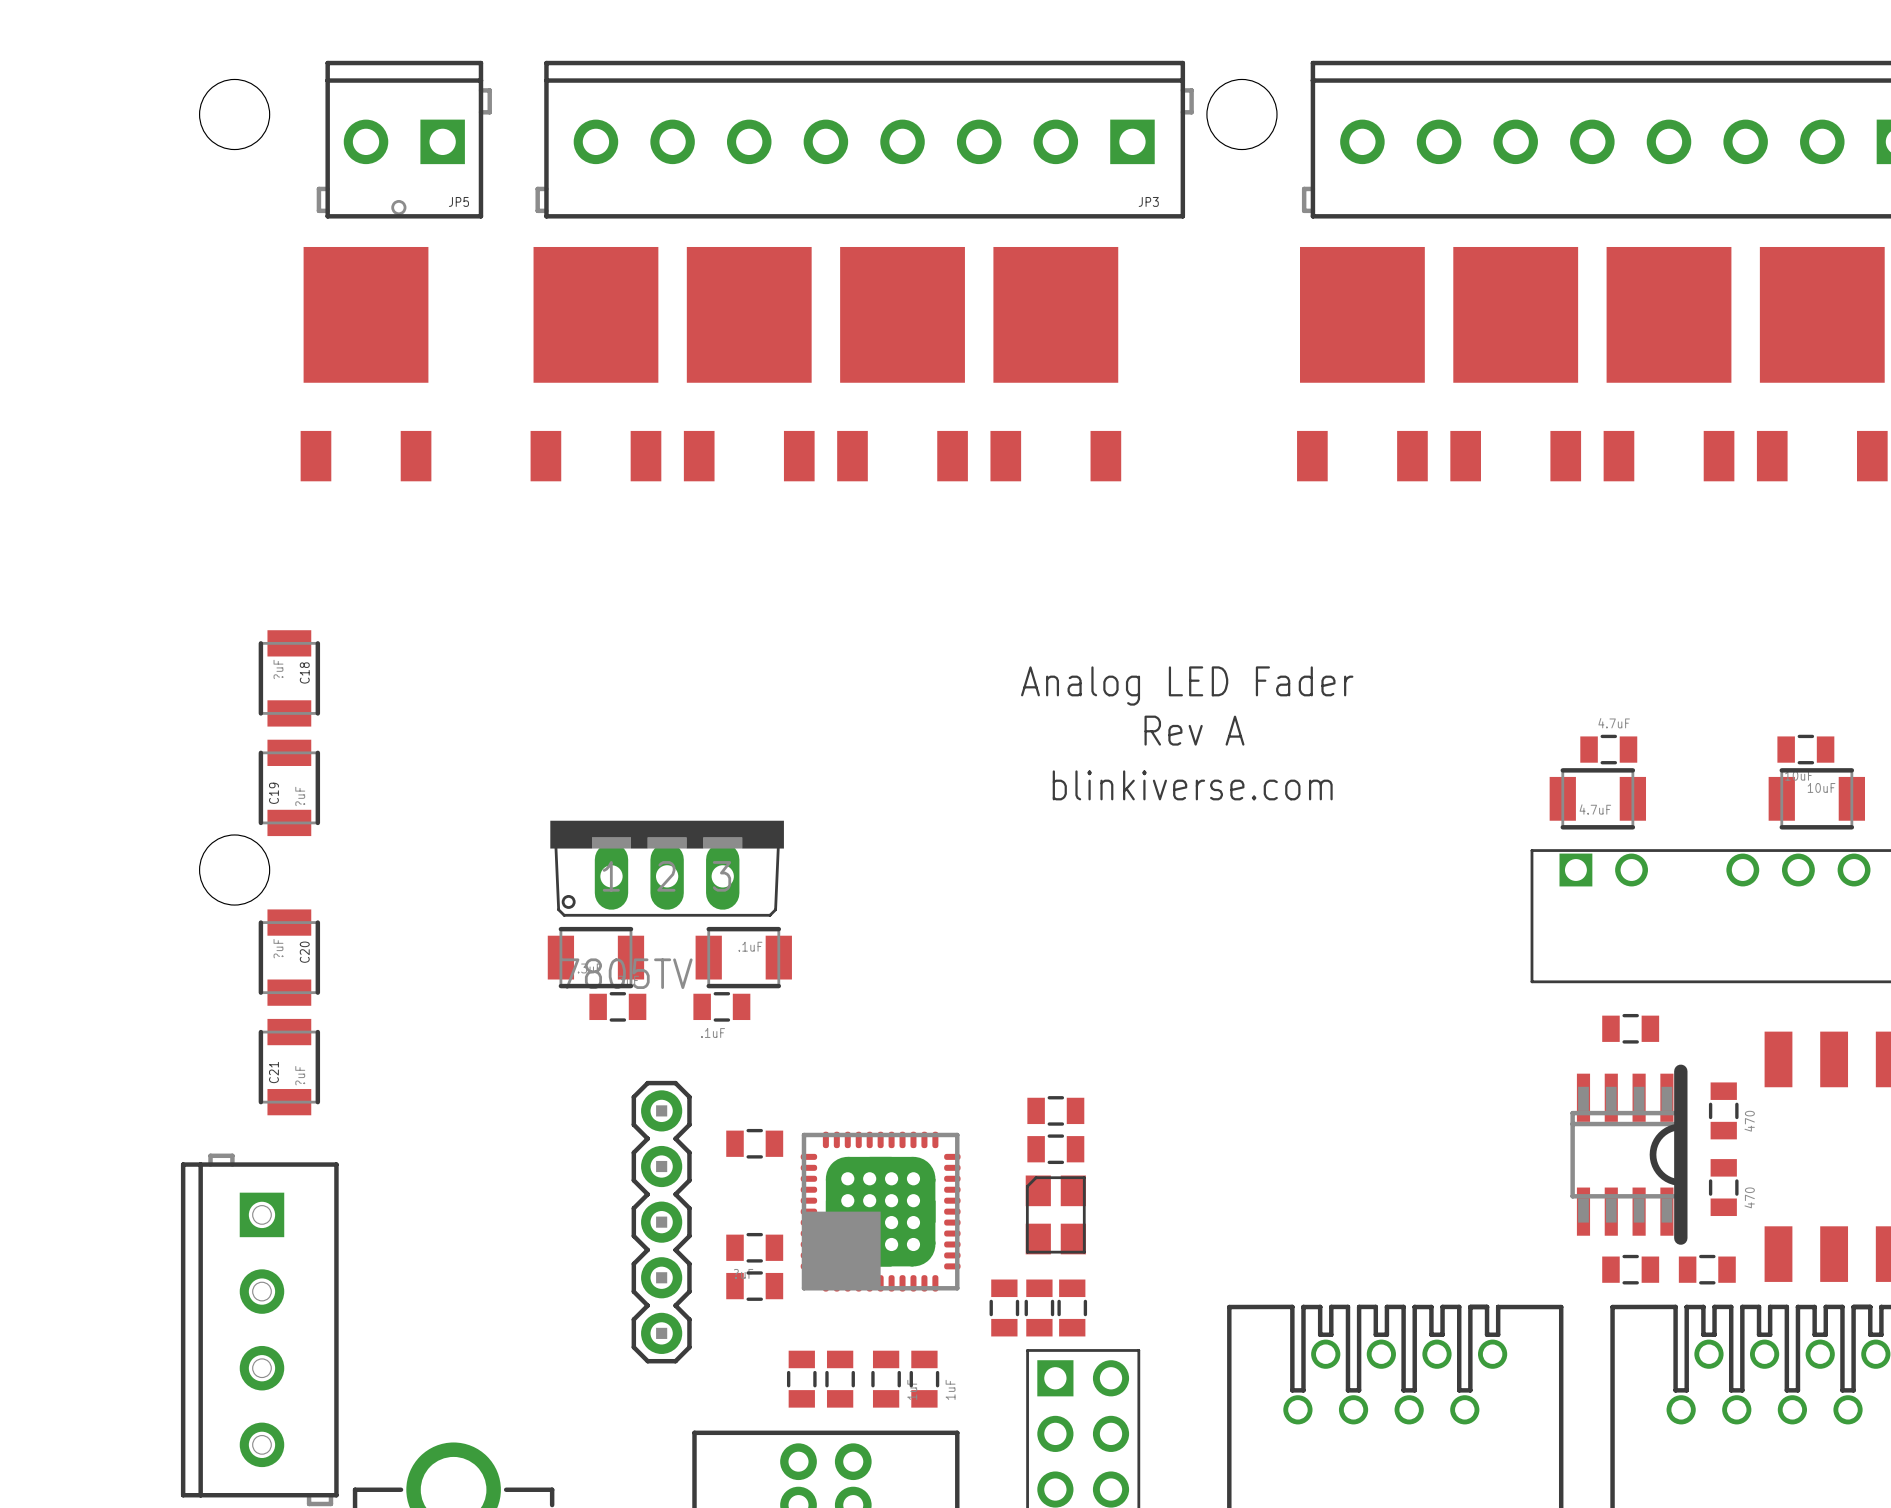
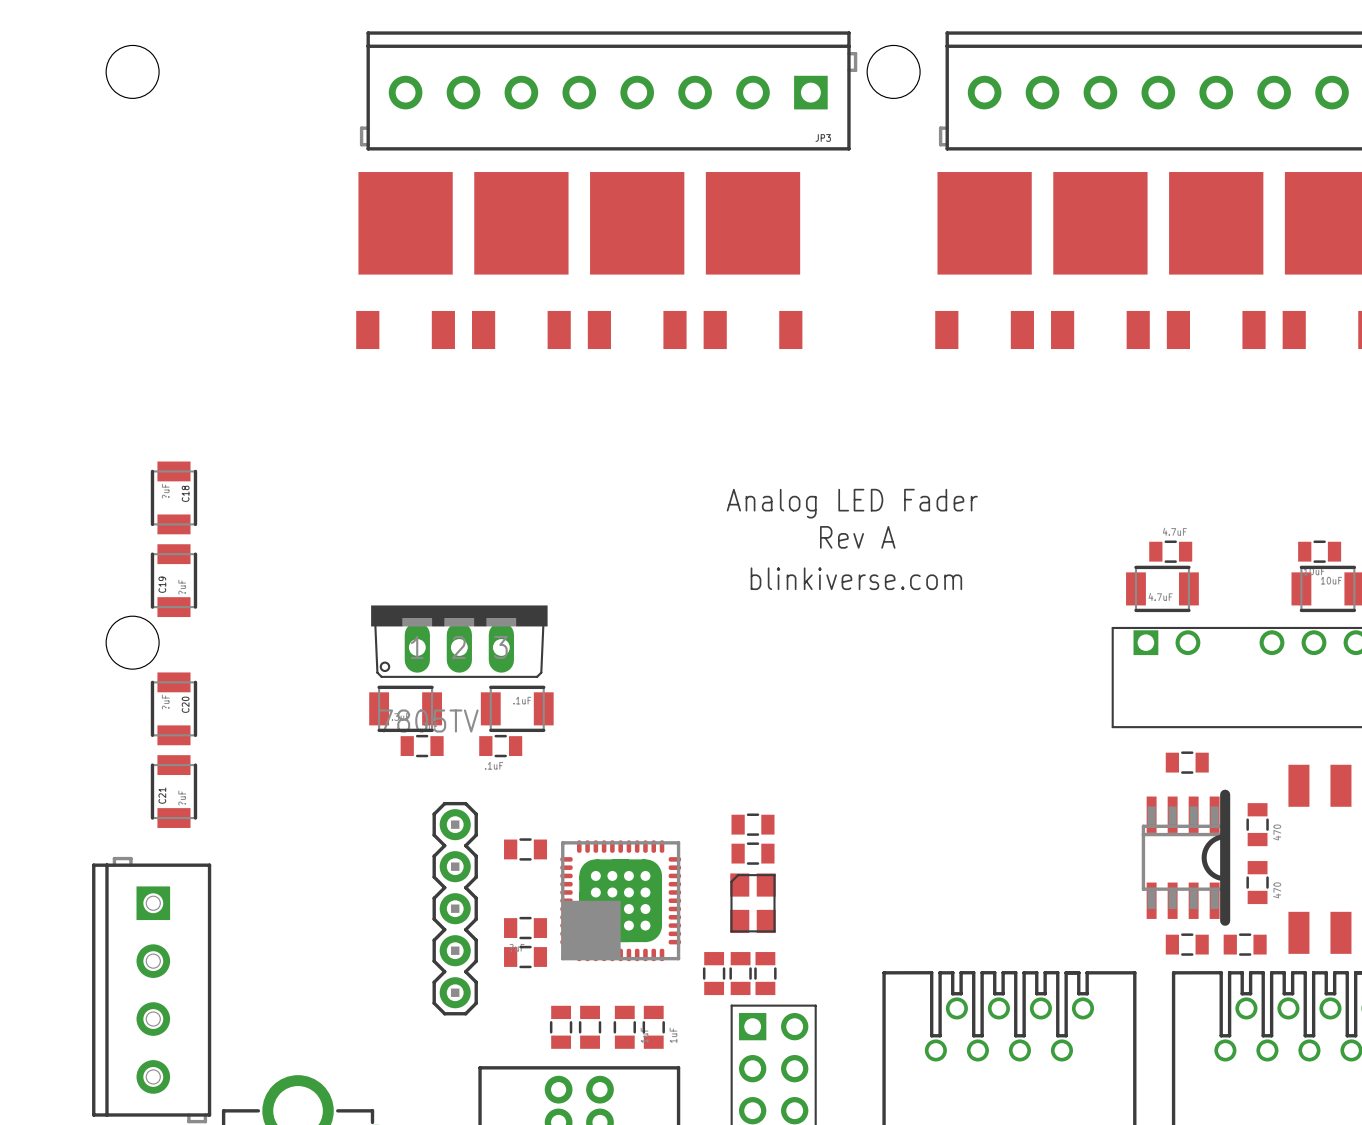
JP5: (404, 139) -> none
part: (366, 364) -> none

